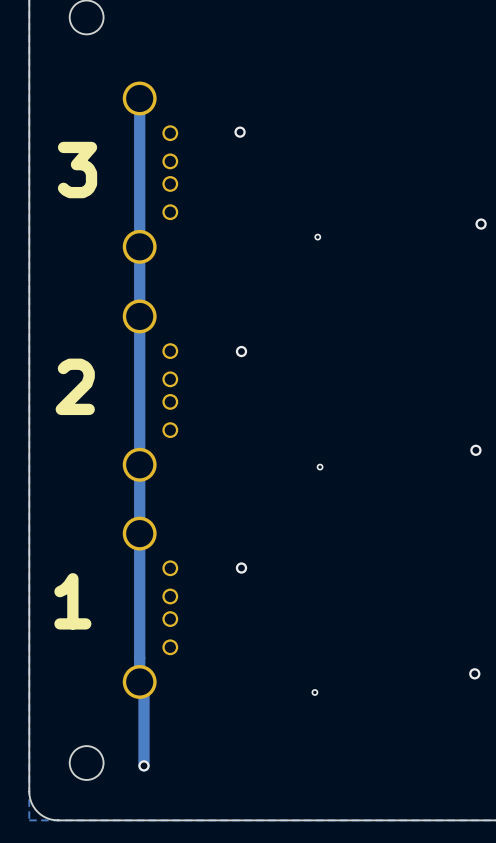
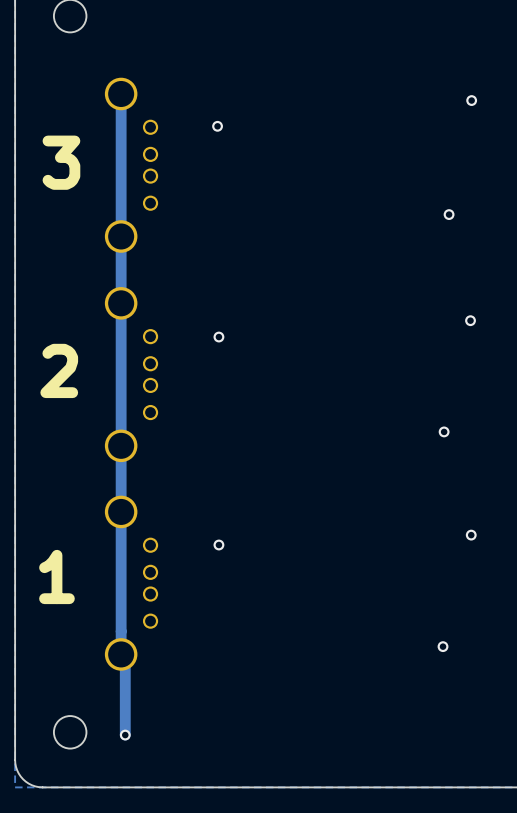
via: (317, 237) -> none
via: (320, 467) -> none
via: (314, 692) -> none

